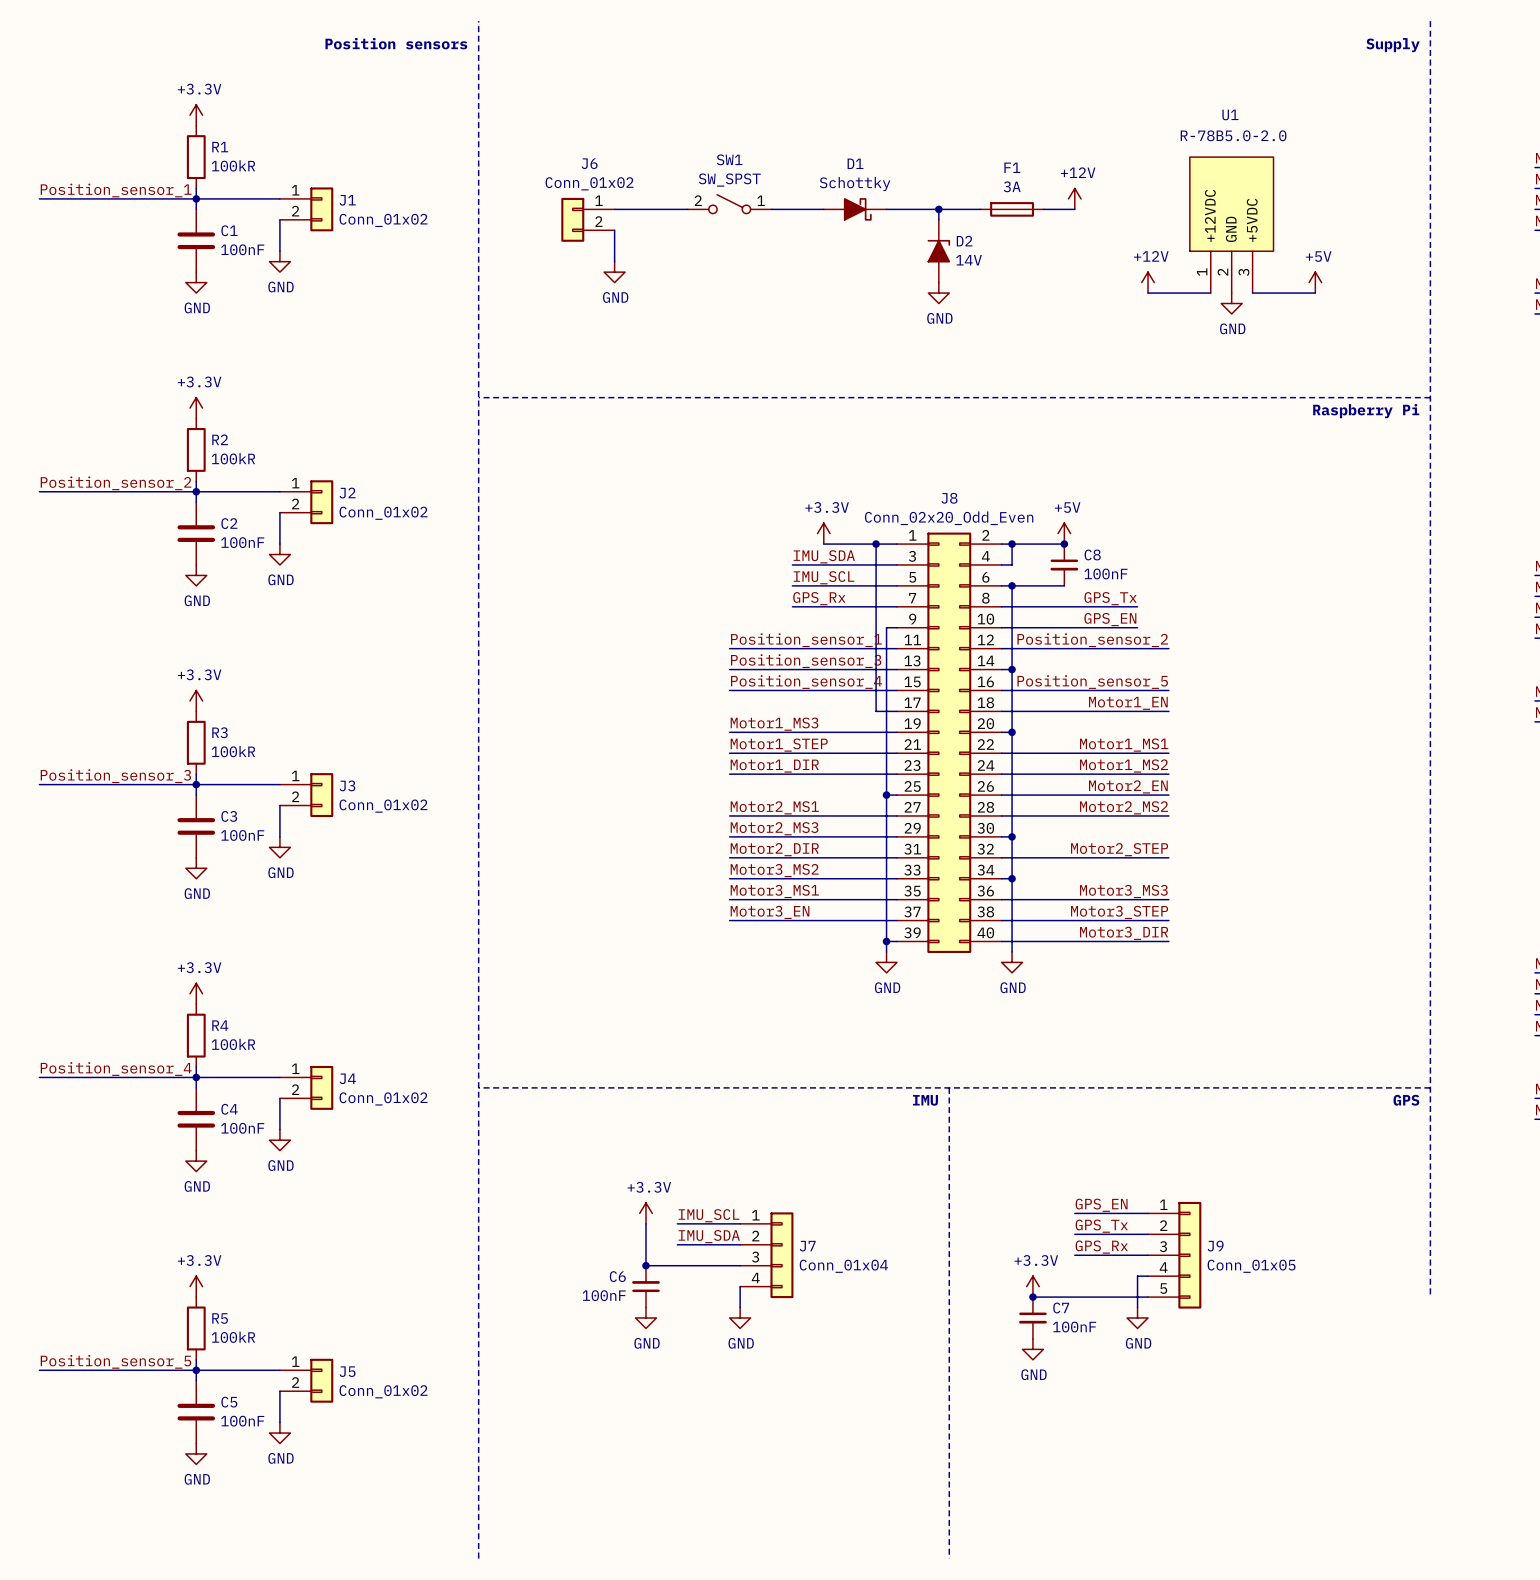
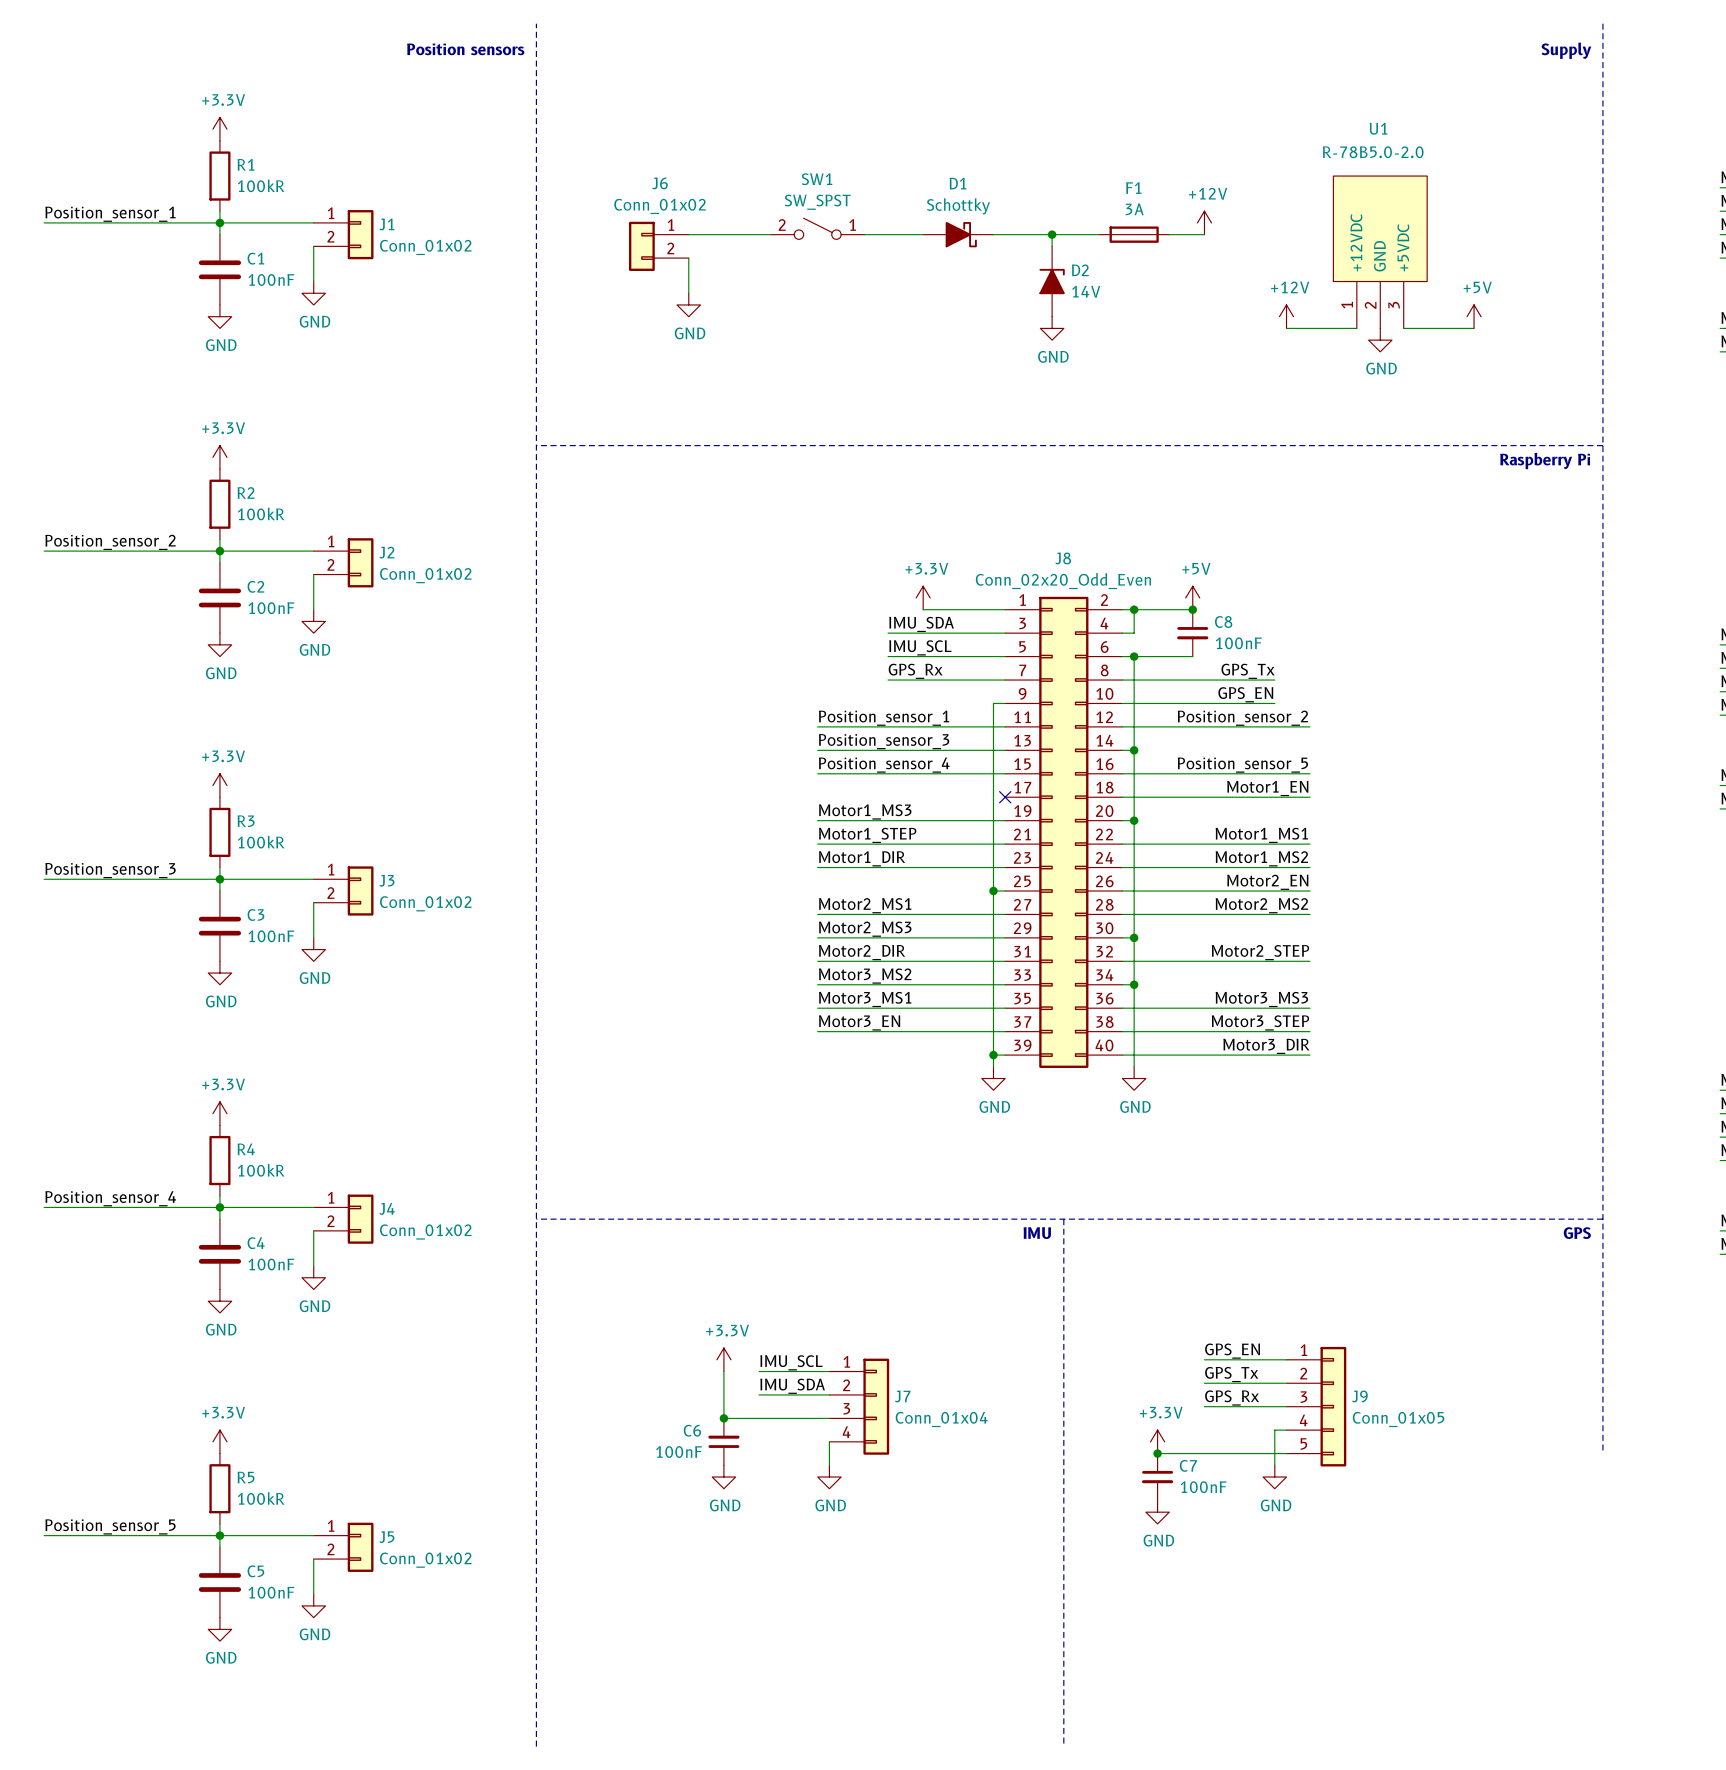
wire: (876, 544) (876, 711) (897, 711) -> none
junction: (876, 544) -> none
no-connect mark: none -> (1005, 797)

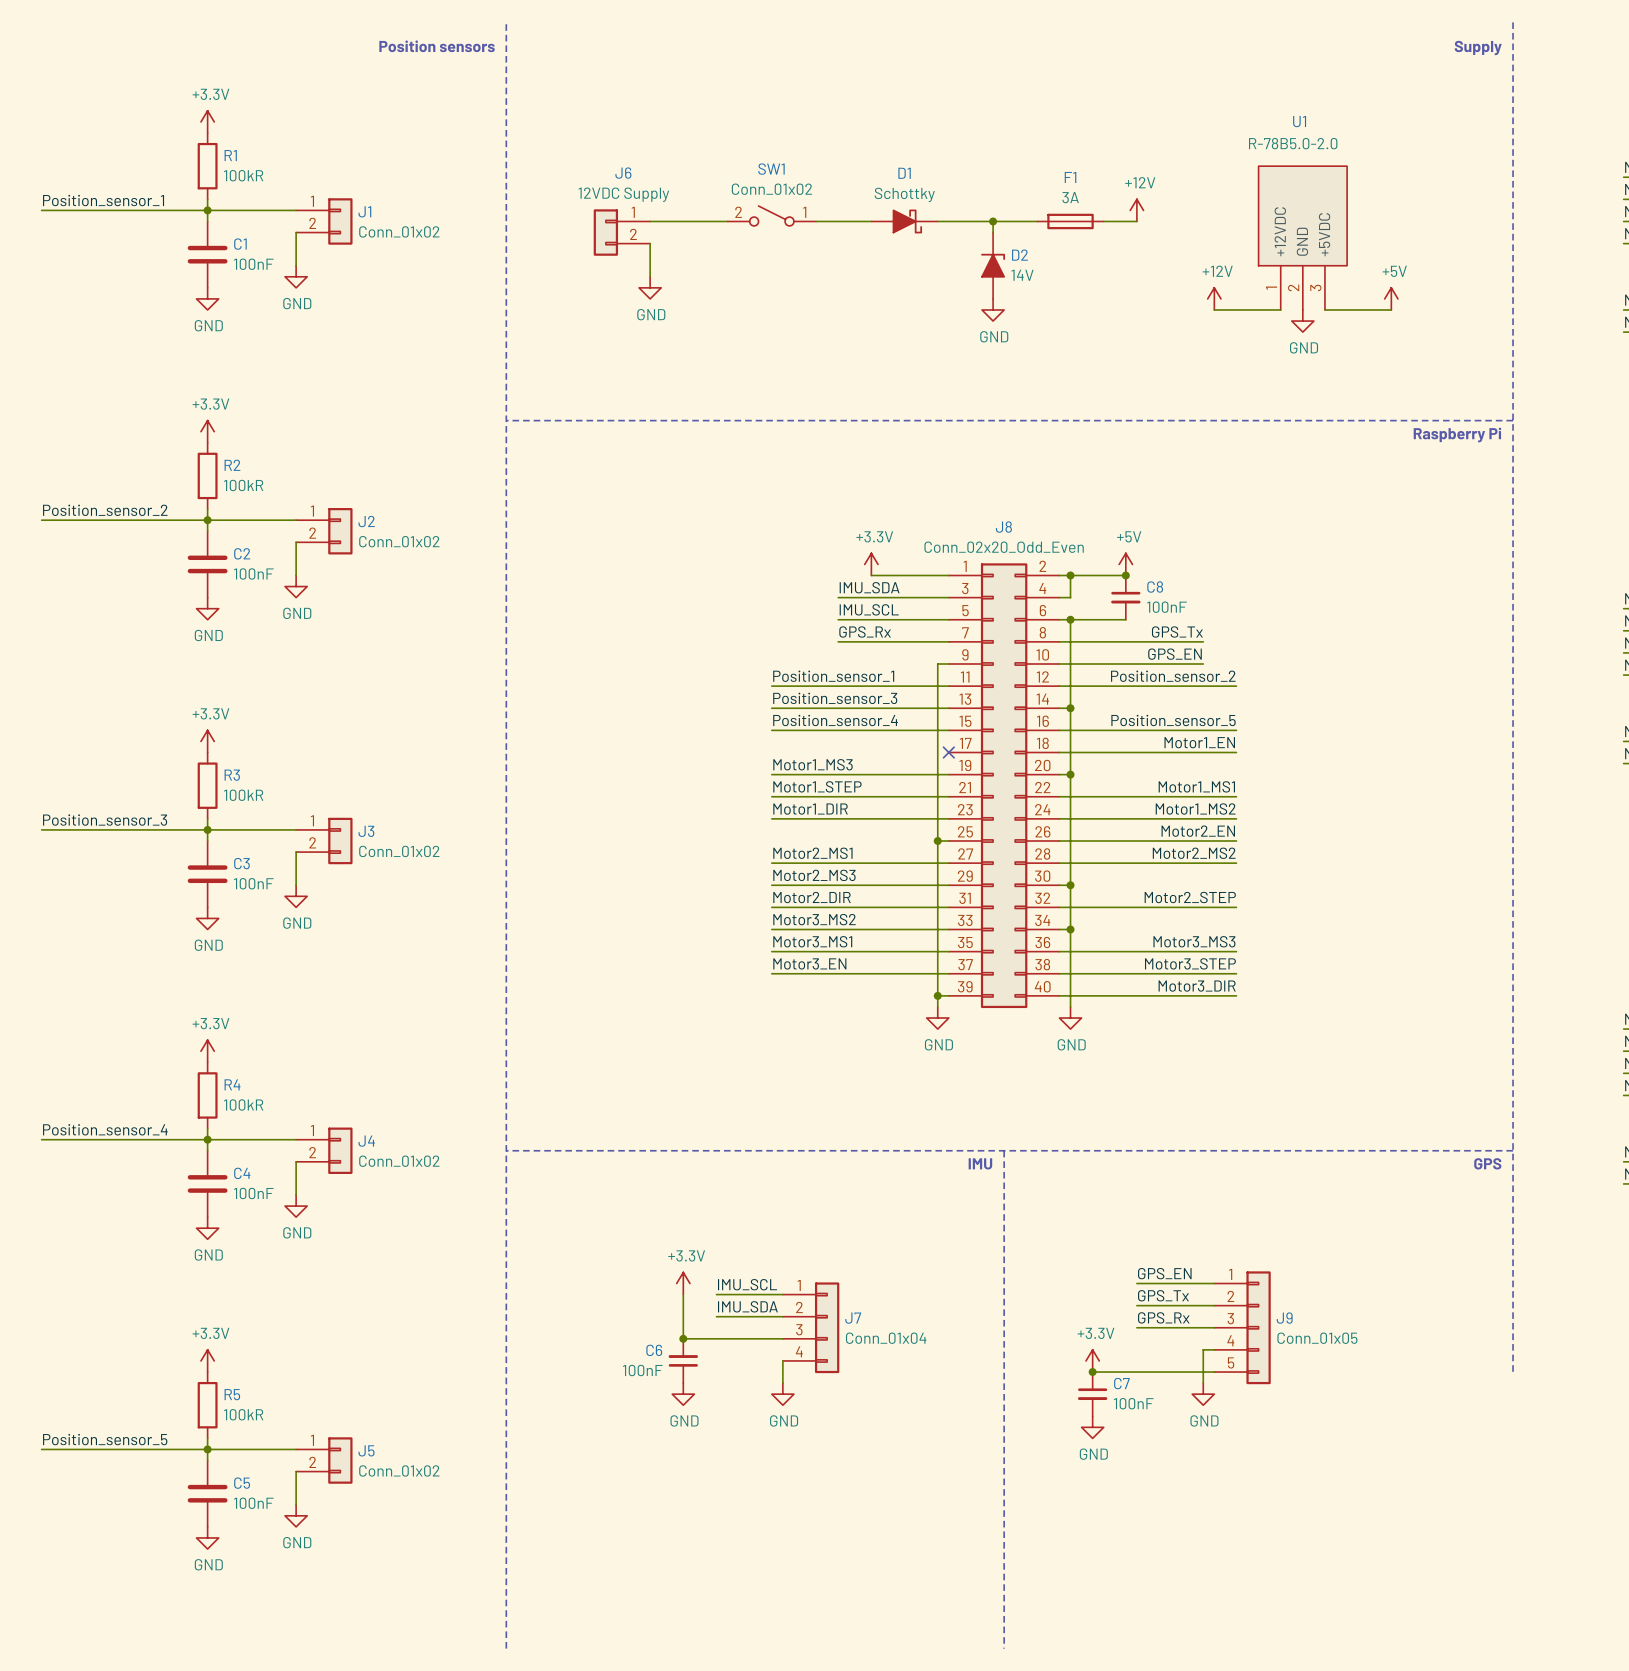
SW1 value: SW_SPST (817, 202) -> Conn_01x02 (771, 189)
J6 value: Conn_01x02 (660, 206) -> 12VDC Supply (623, 194)

